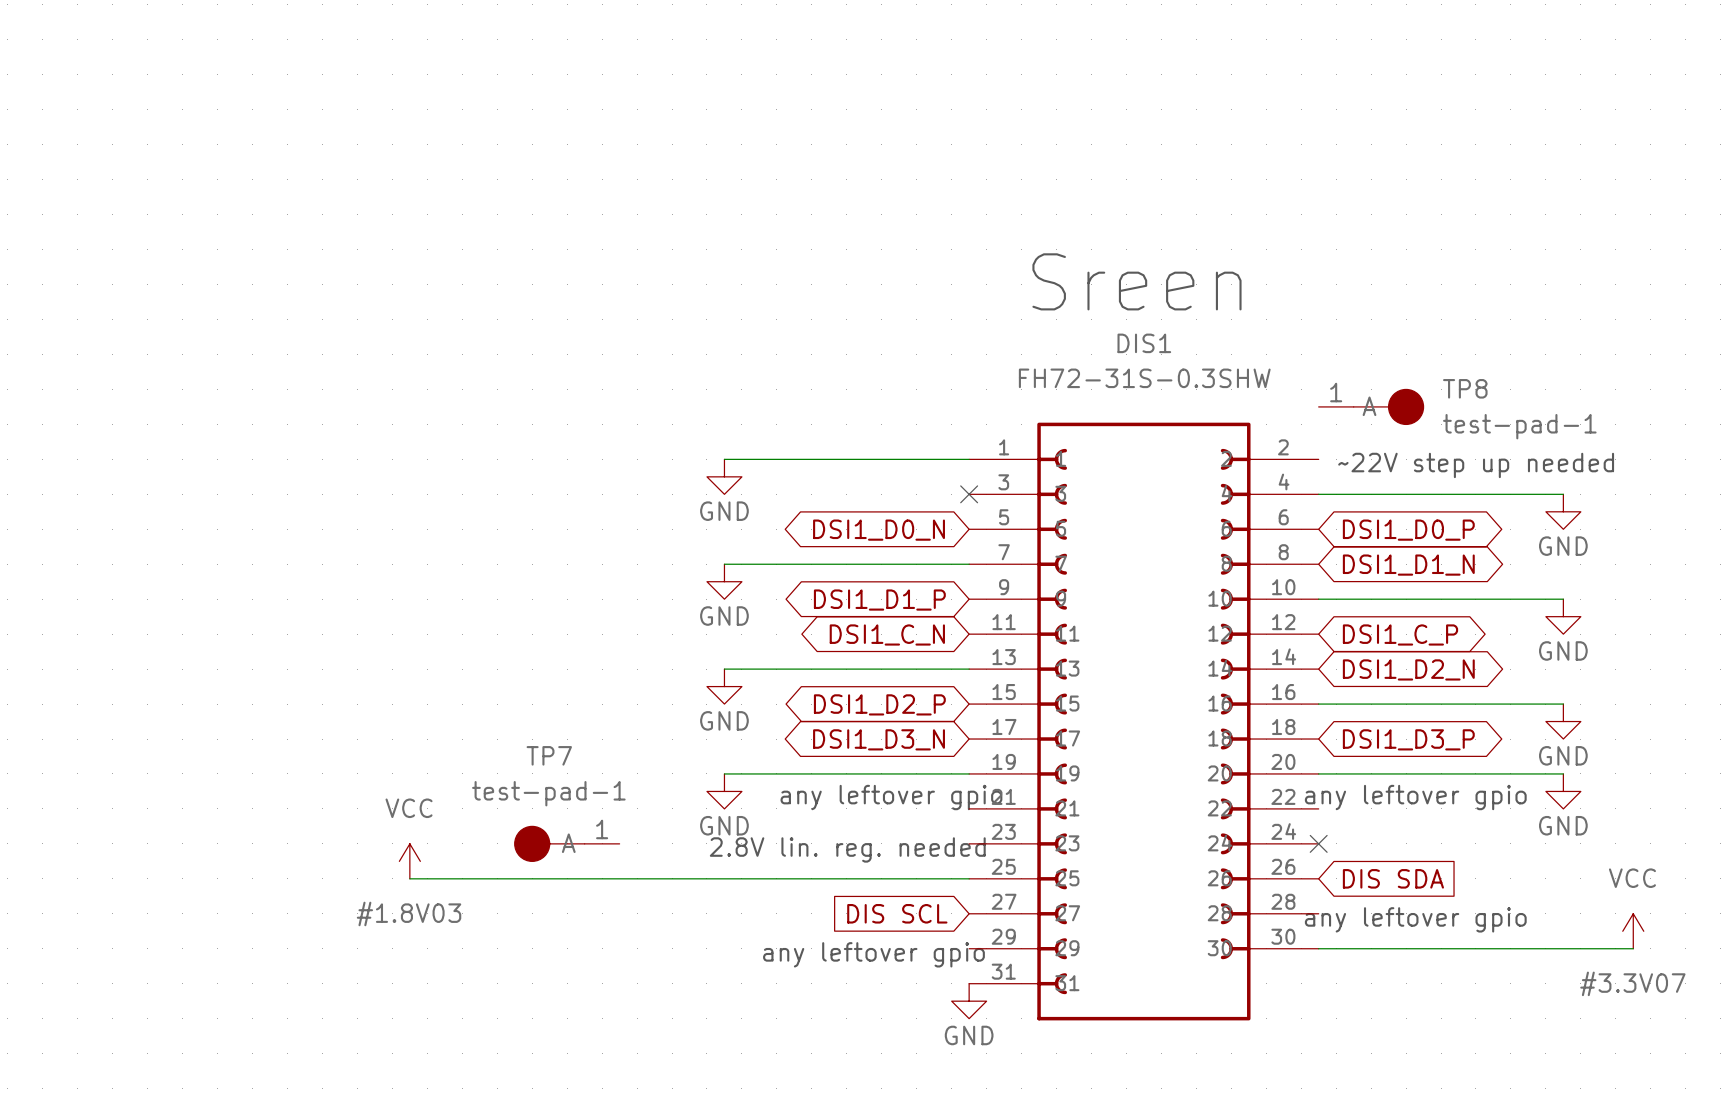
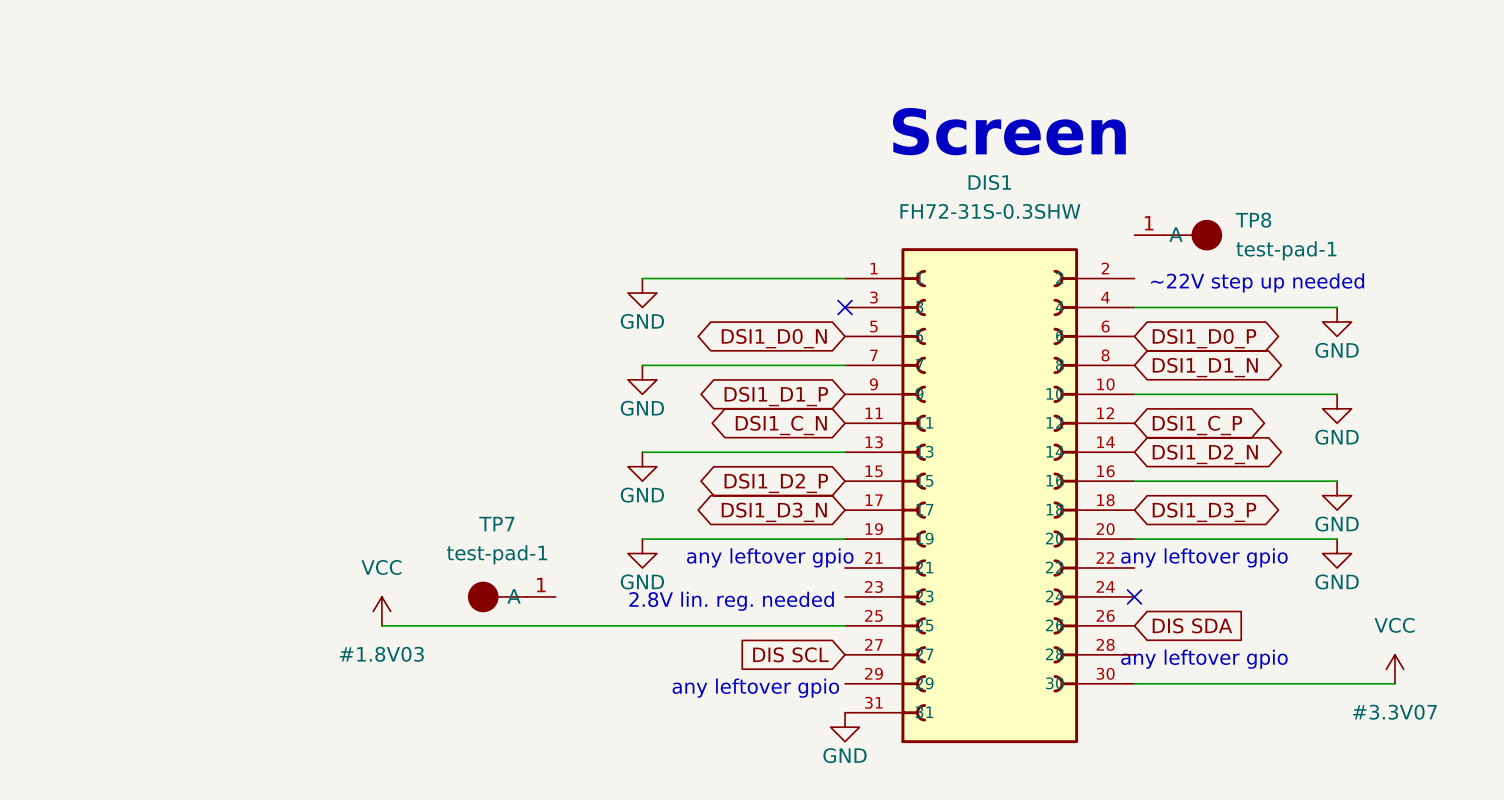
text: Sreen (1136, 281) -> Screen (1009, 131)

